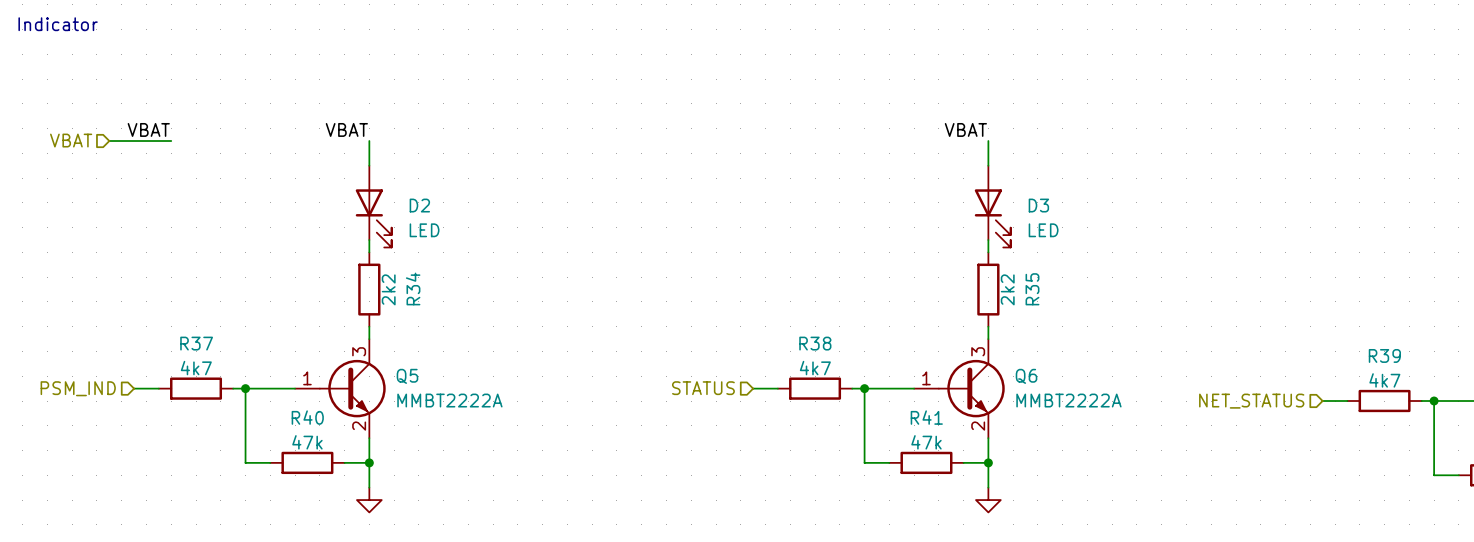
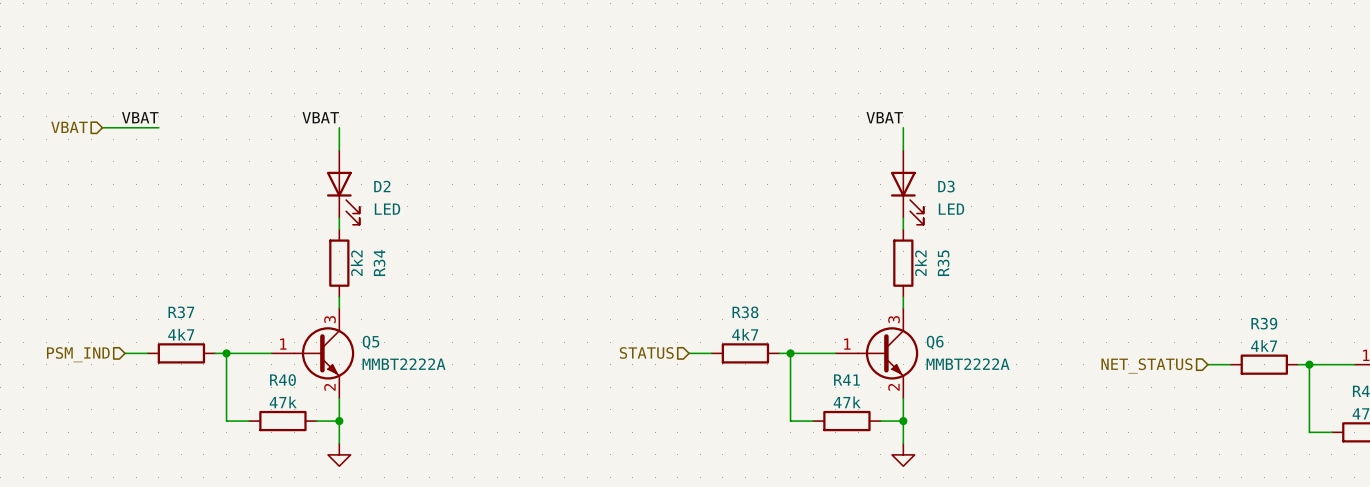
text: Indicator (58, 24) -> none

